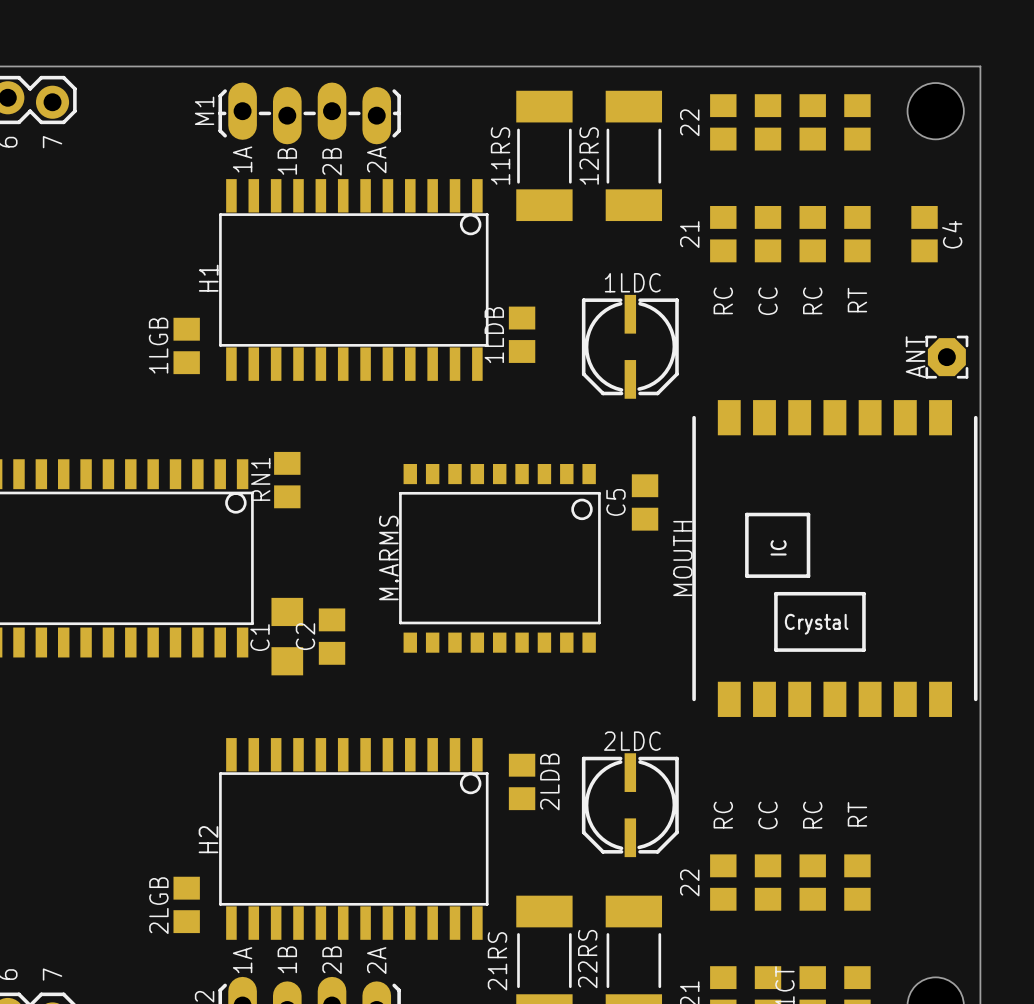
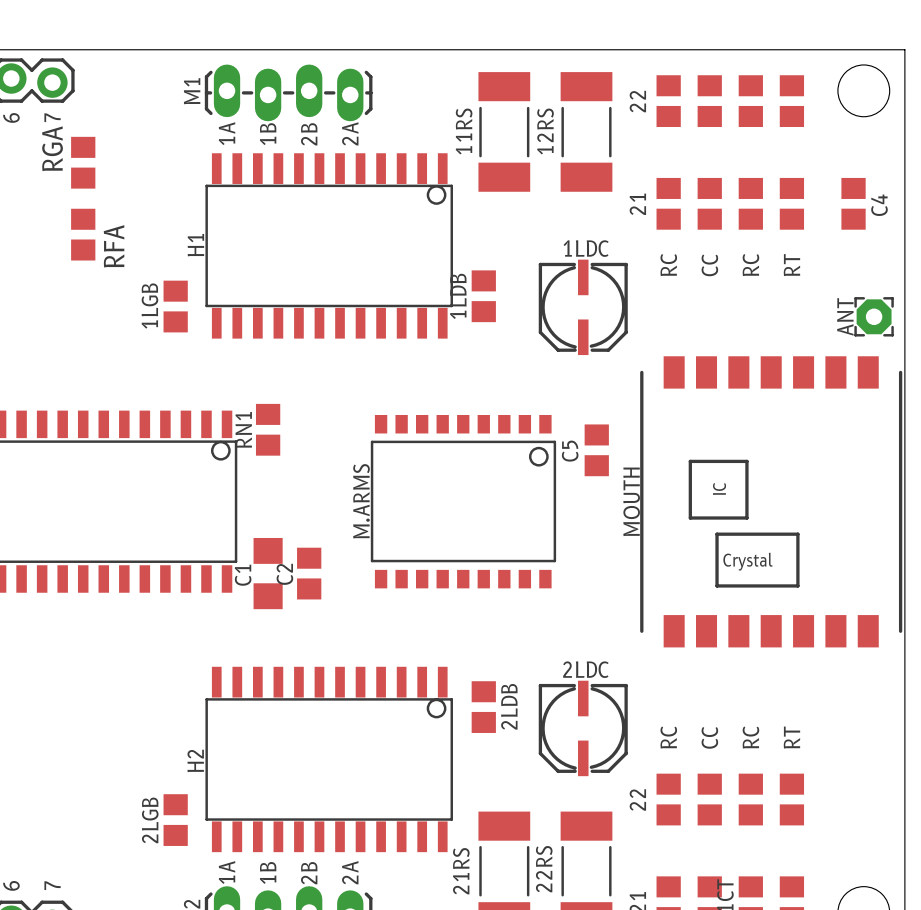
RGA: none -> (83, 162)
RFA: none -> (83, 234)

